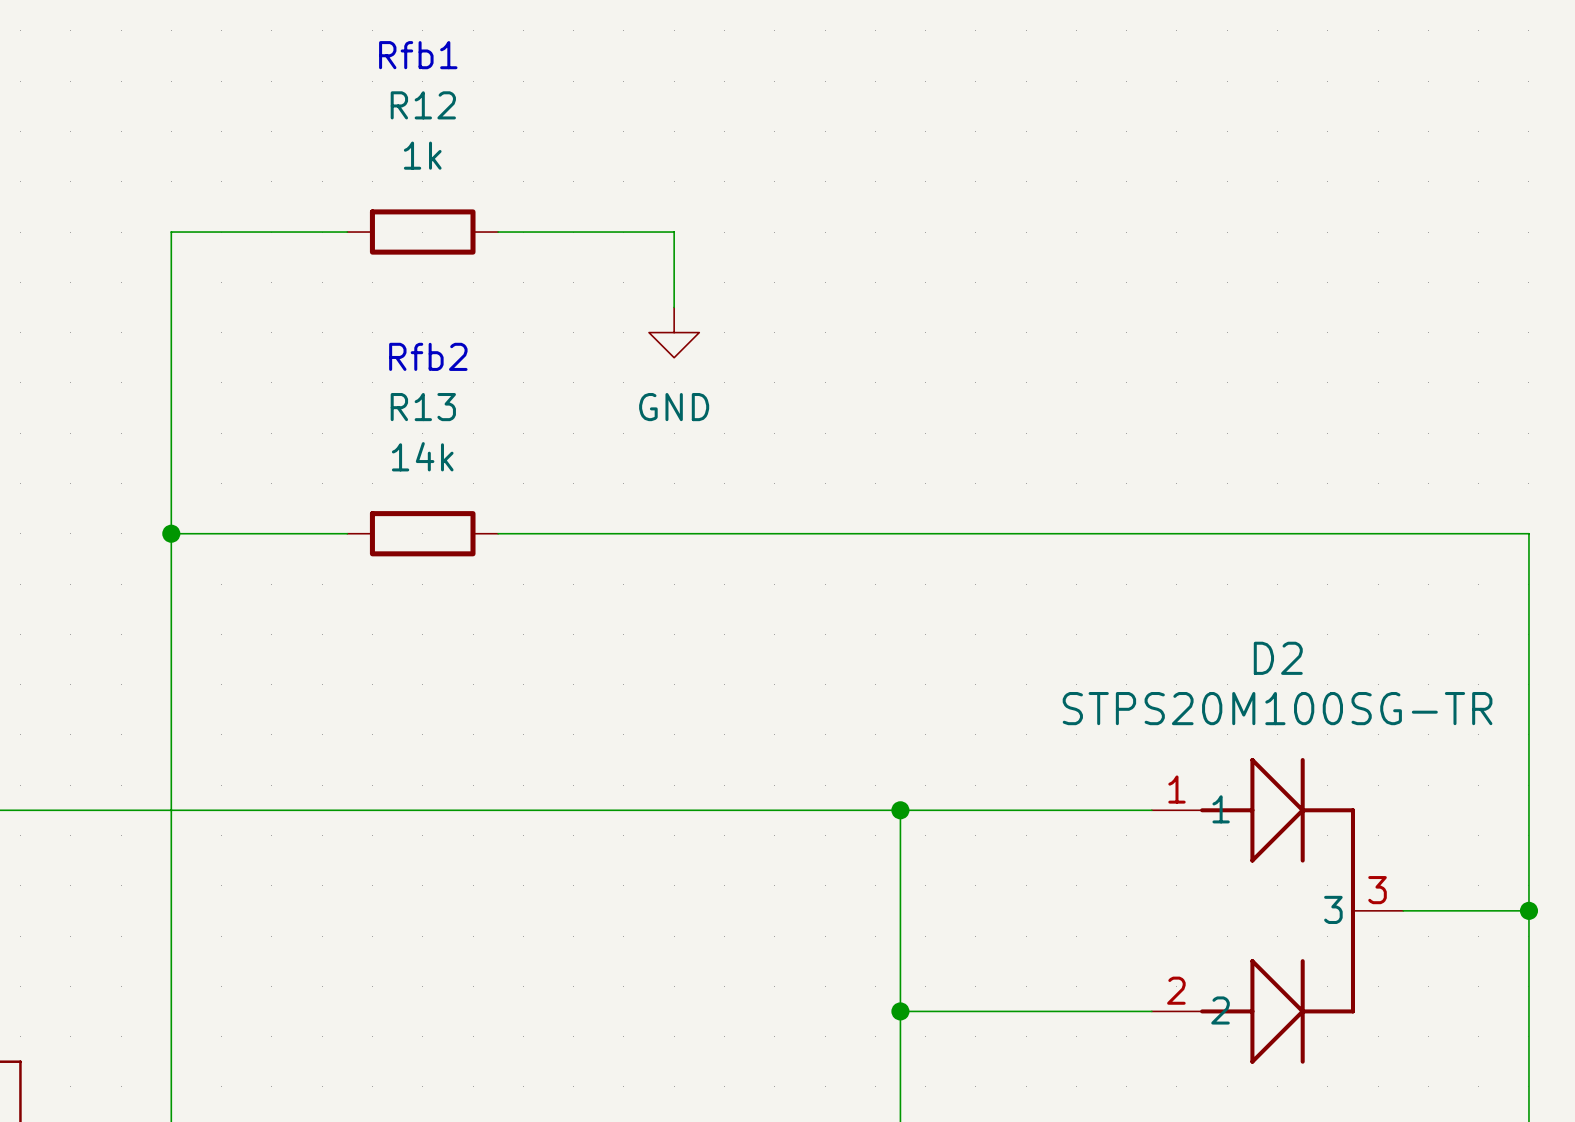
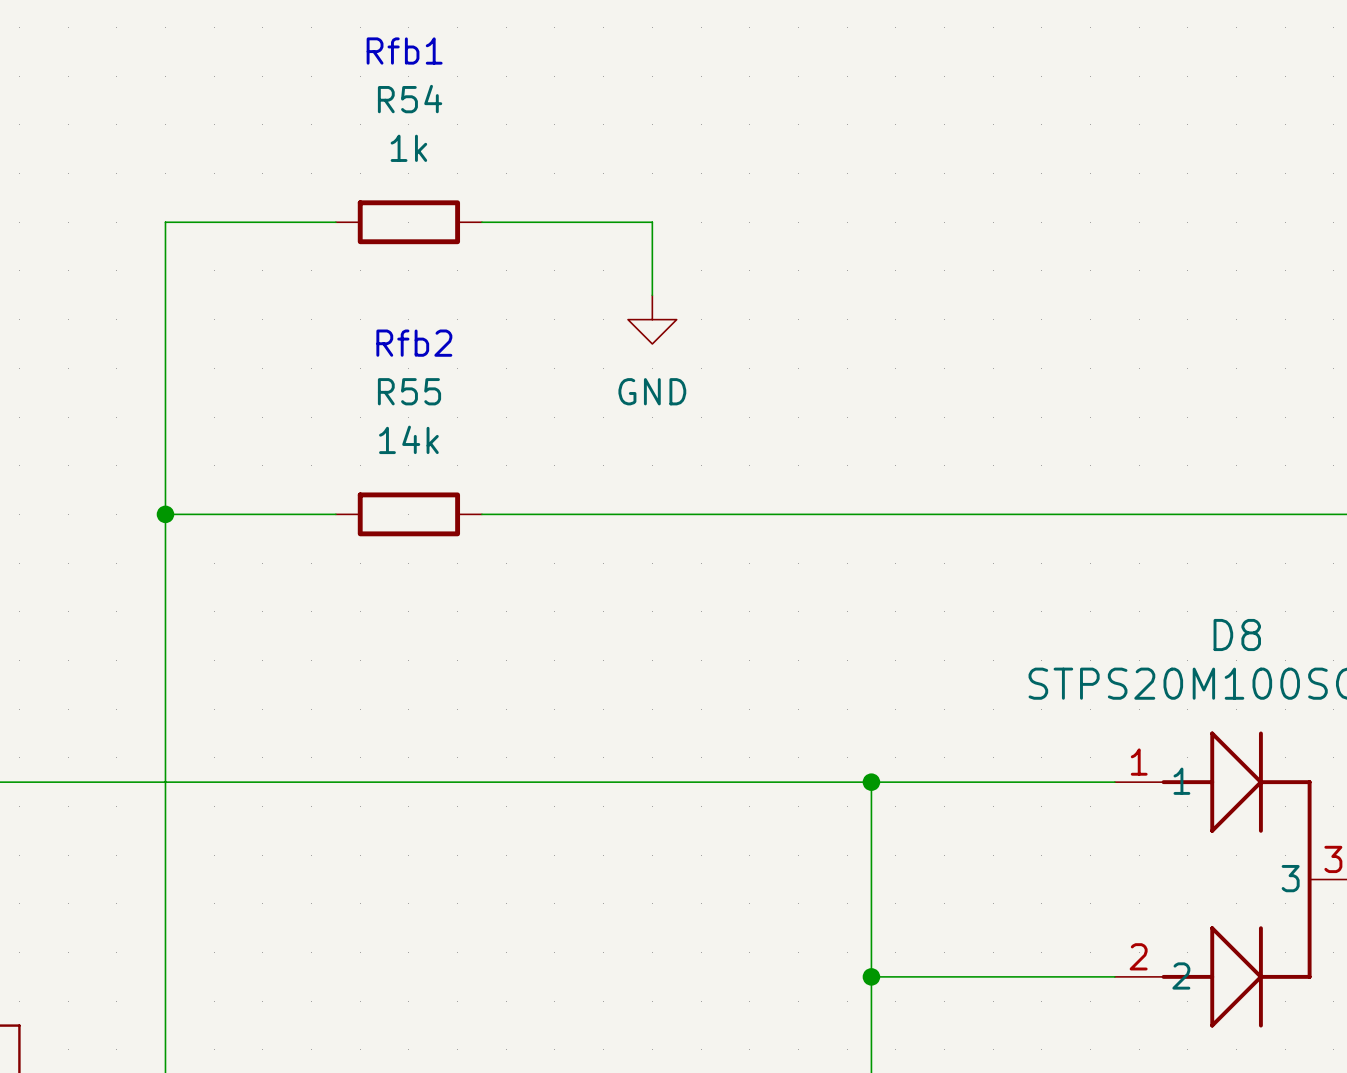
R12 name: R12 (423, 105) -> R54 (410, 99)
R13 name: R13 (423, 407) -> R55 (409, 391)
D2 name: D2 (1278, 658) -> D8 (1237, 634)

